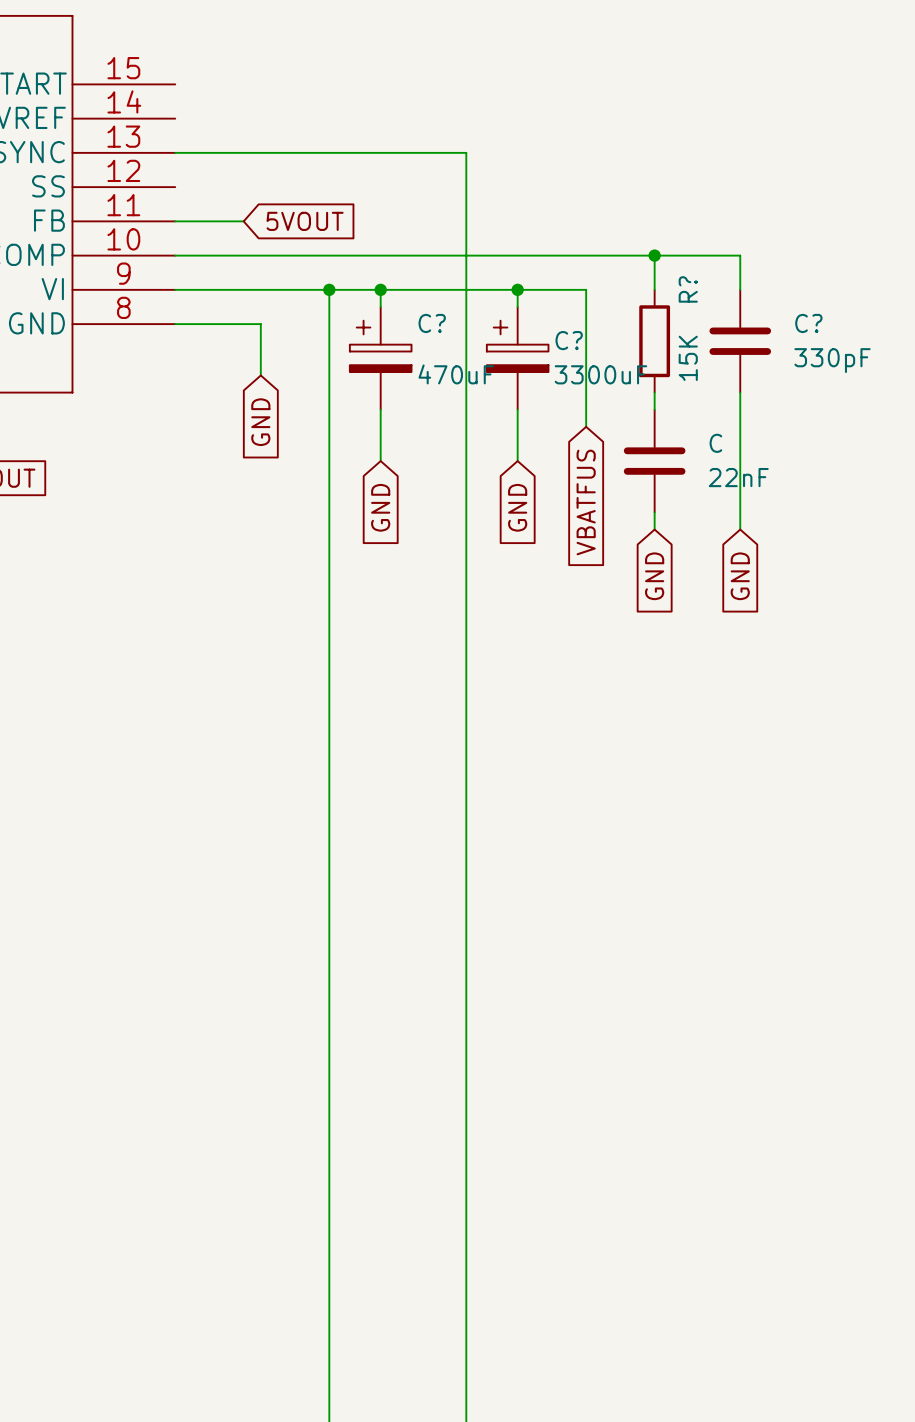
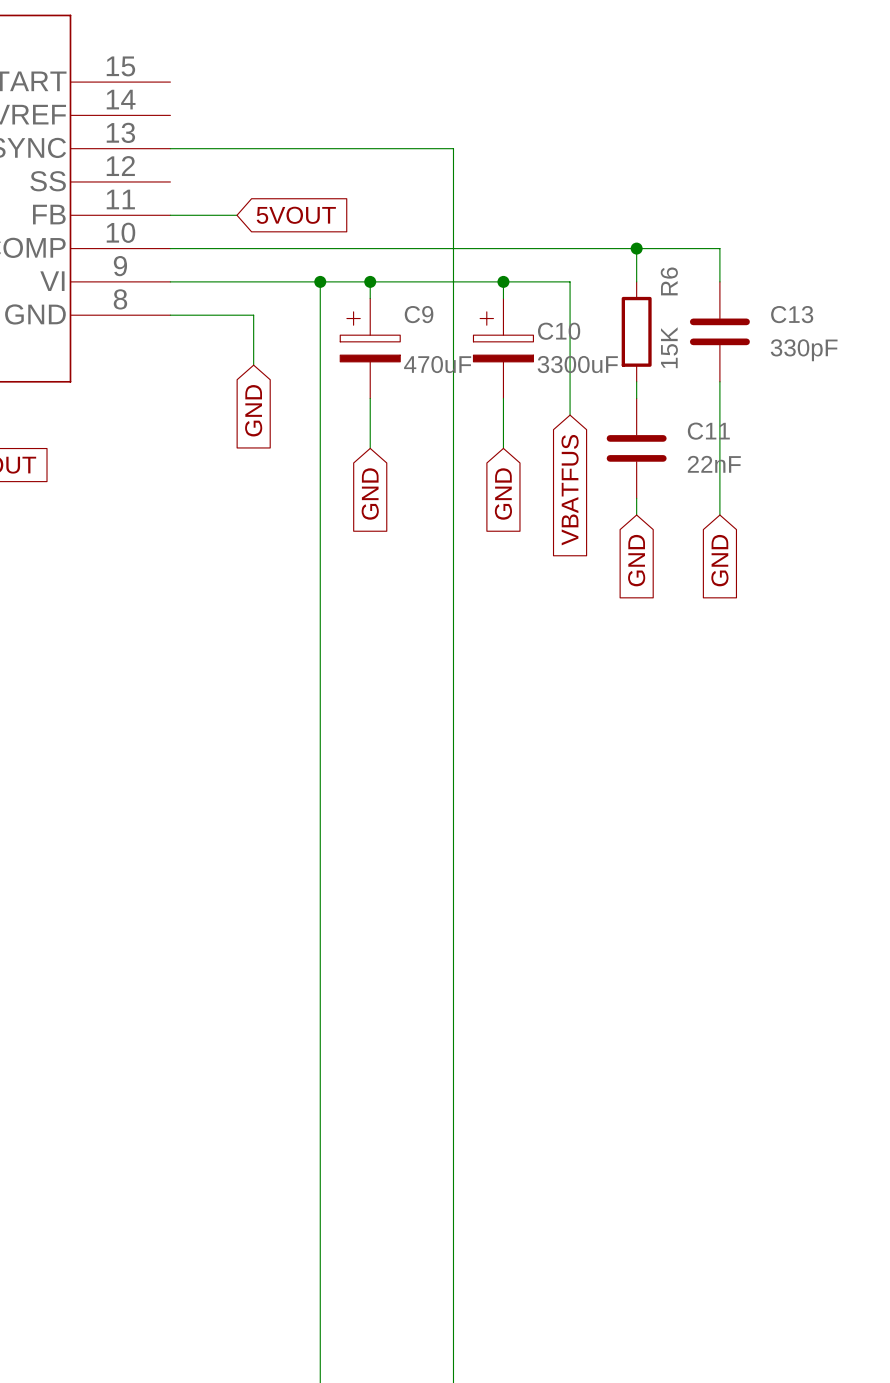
R? name: R? (688, 289) -> R6 (669, 281)
C? name: C? (432, 323) -> C9 (419, 314)
C? name: C? (808, 323) -> C13 (792, 314)
C? name: C? (569, 340) -> C10 (559, 331)
C name: C (715, 443) -> C11 (708, 431)

